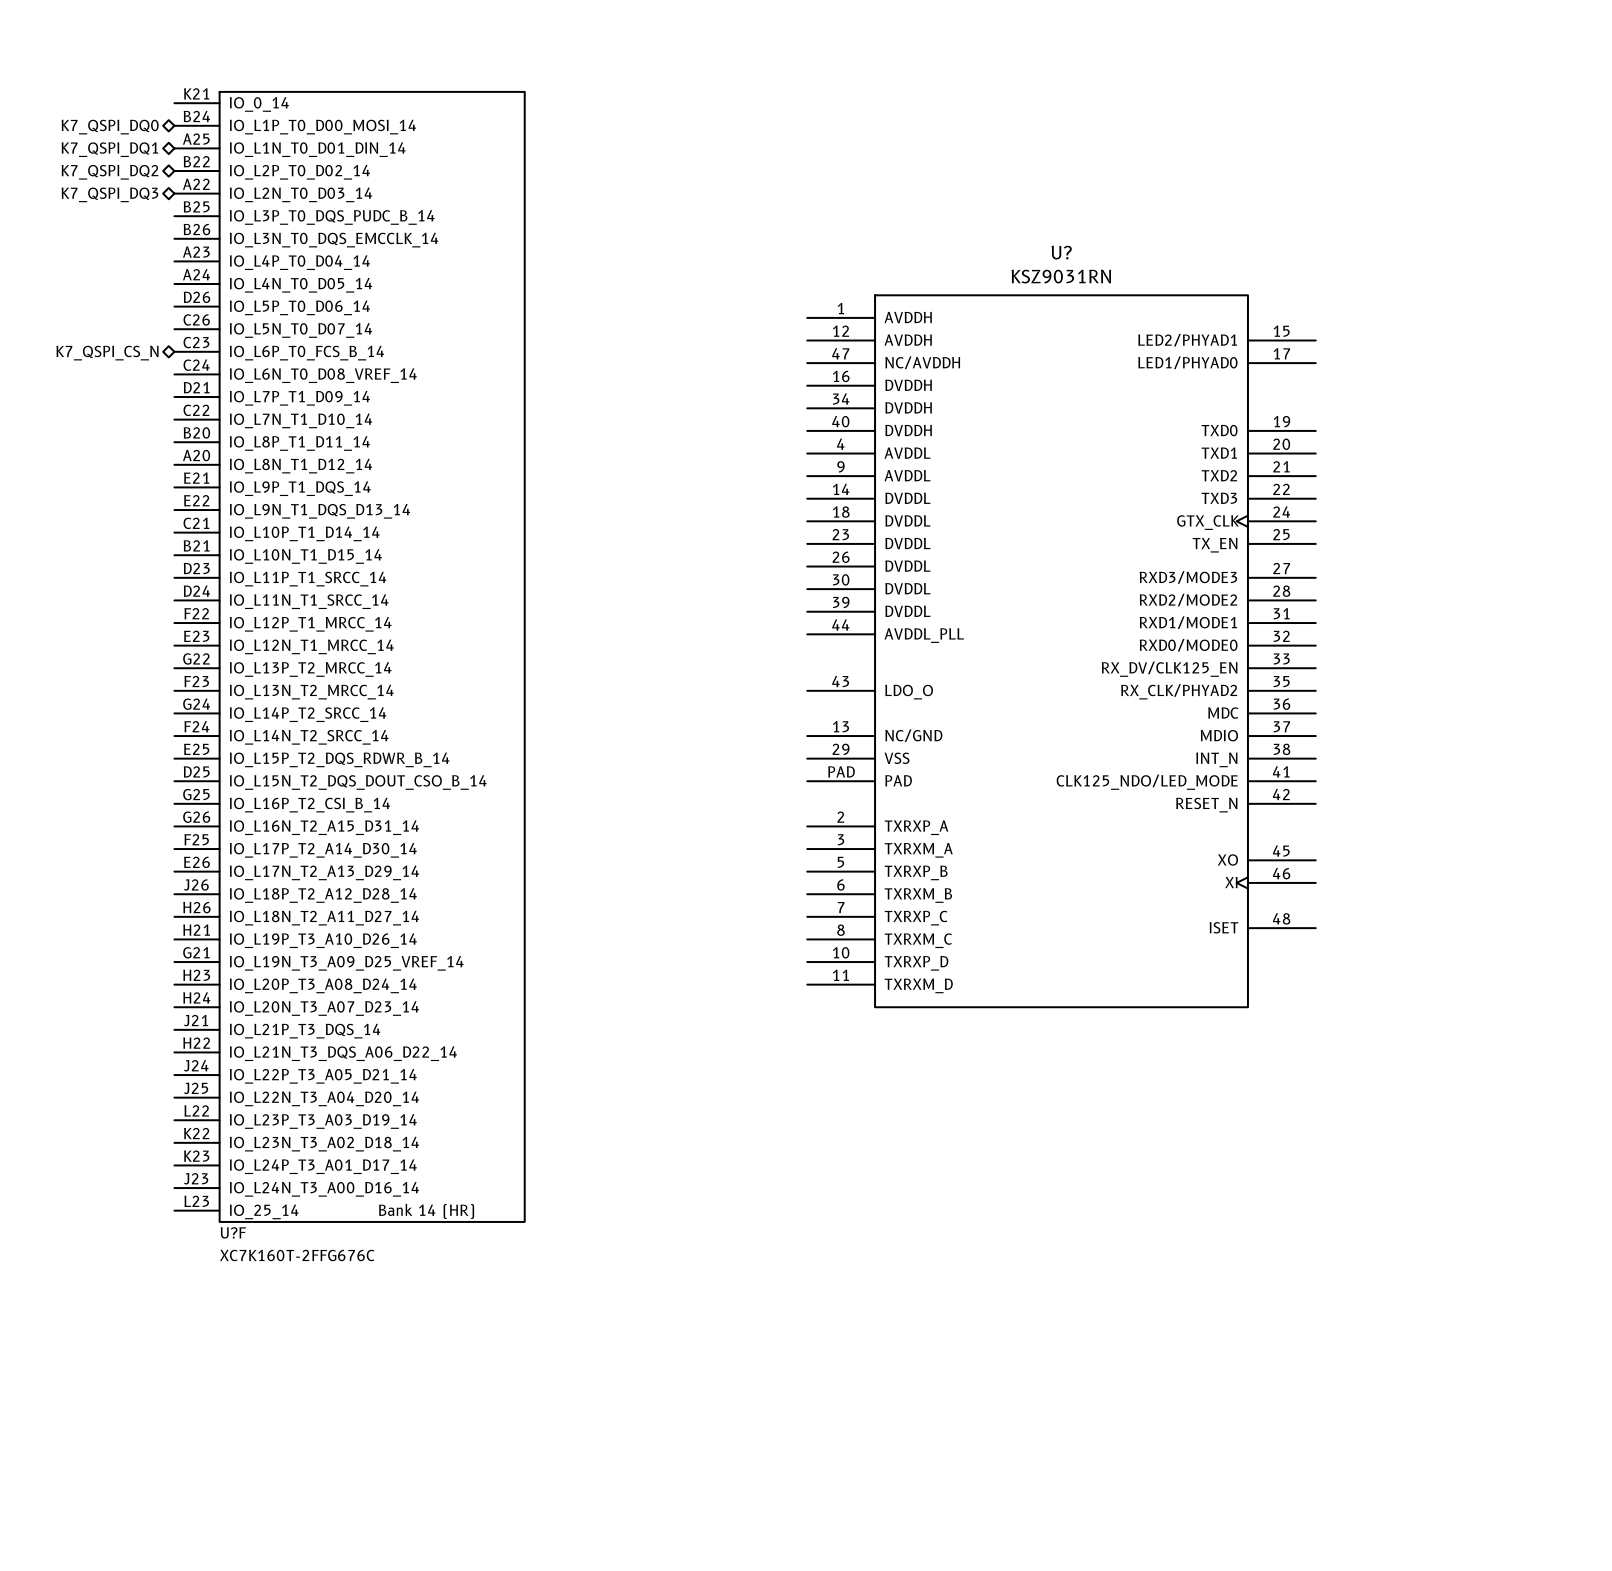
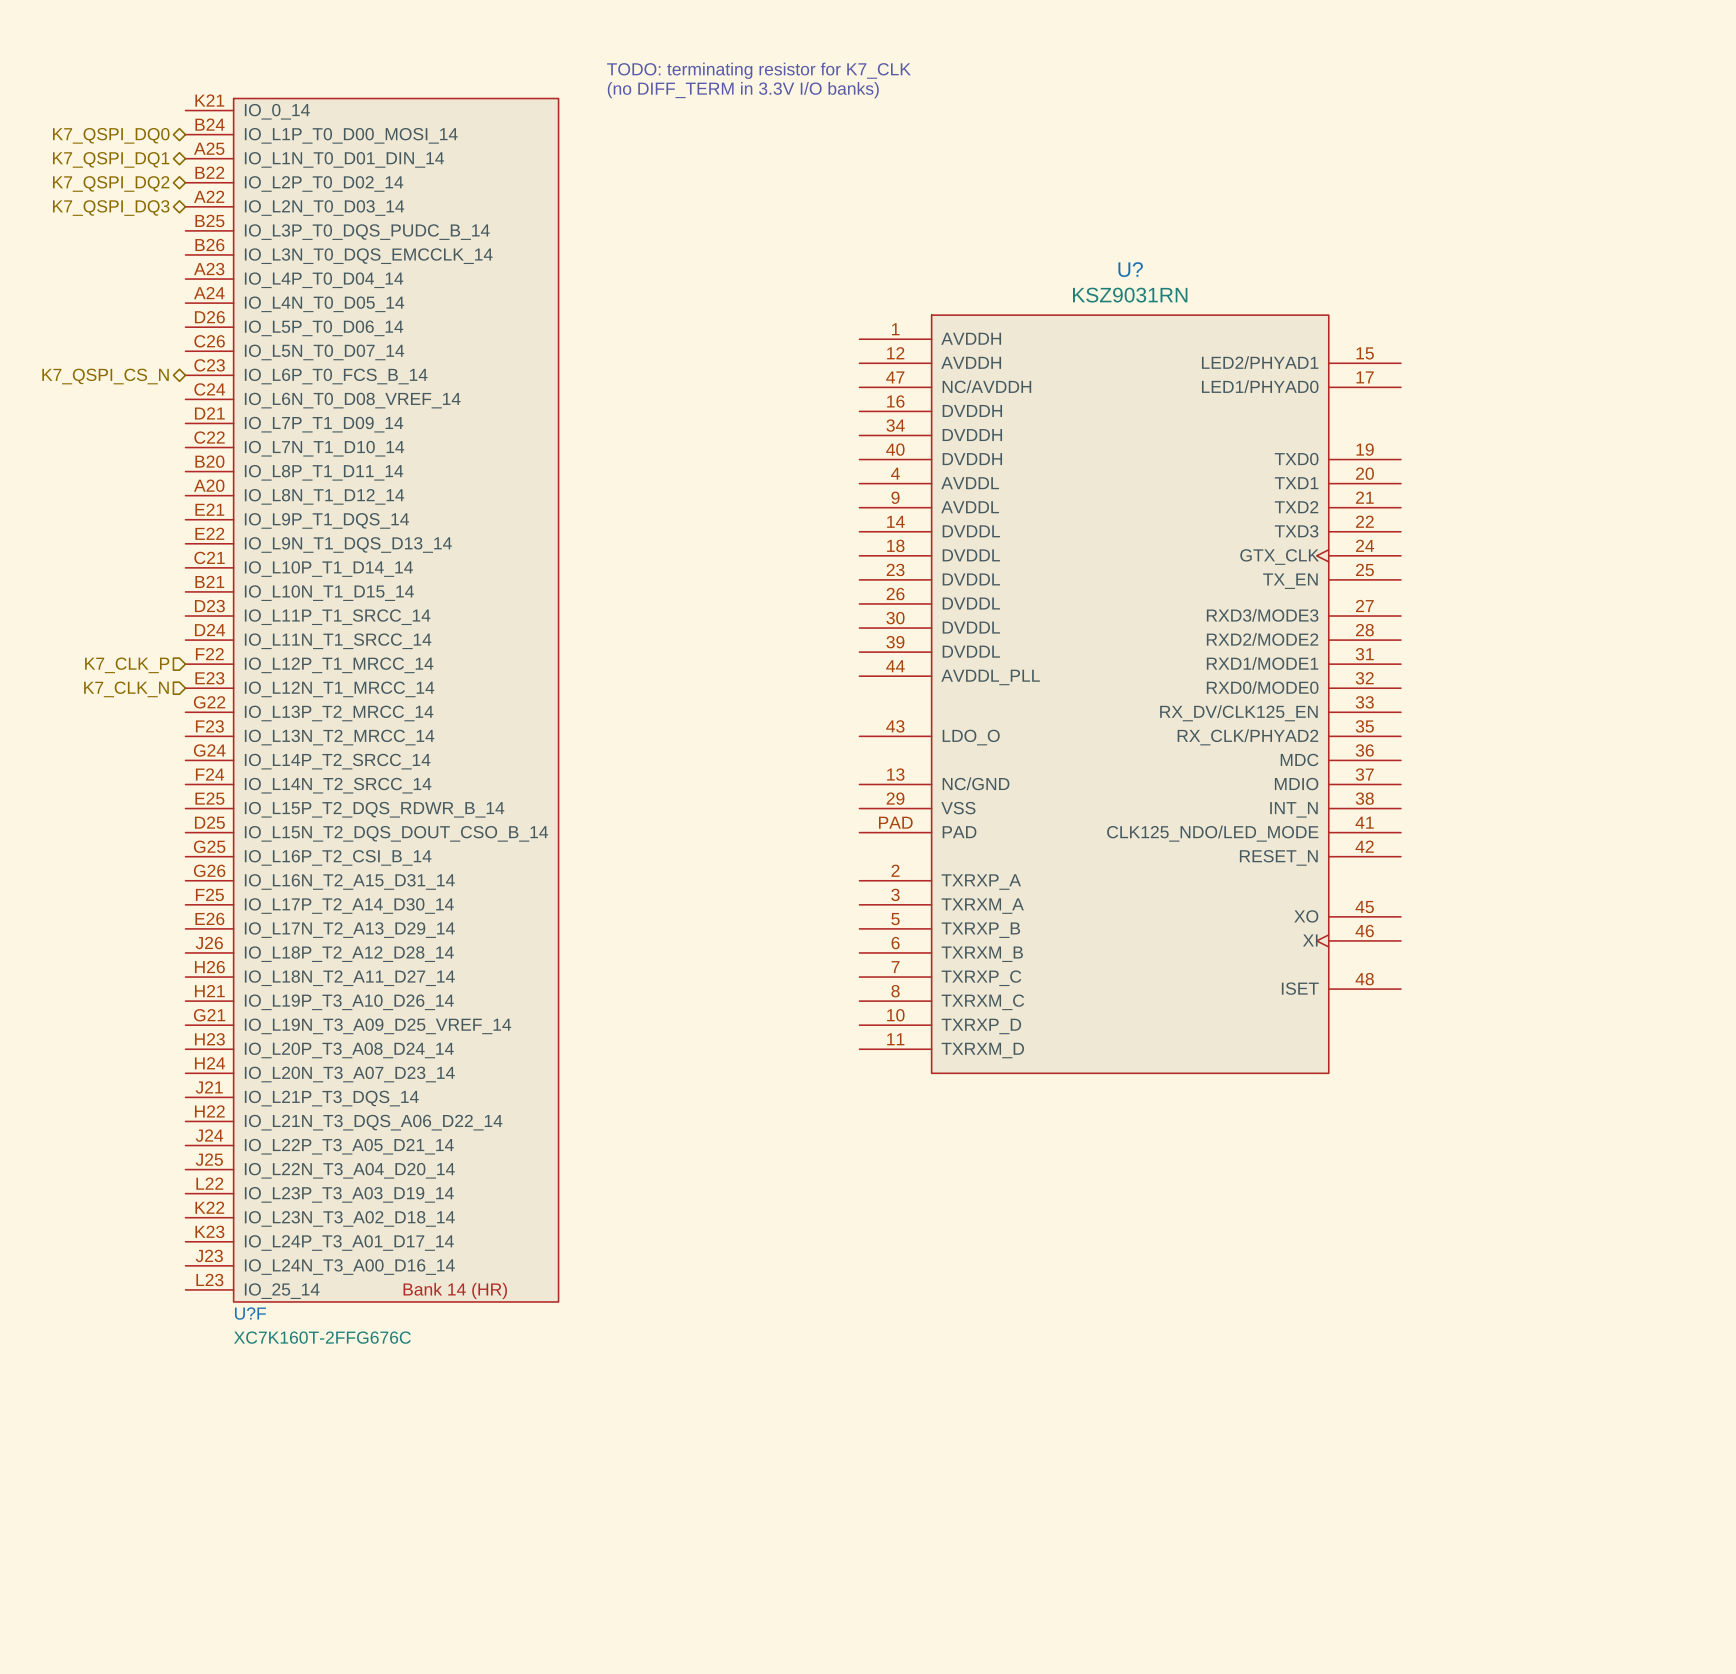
text: none -> TODO: terminating resistor for K7_CLK (758, 70)
text: none -> (no DIFF_TERM in 3.3V I/O banks) (743, 90)
hierarchical label: none -> K7_CLK_P (127, 665)
hierarchical label: none -> K7_CLK_N (126, 689)

